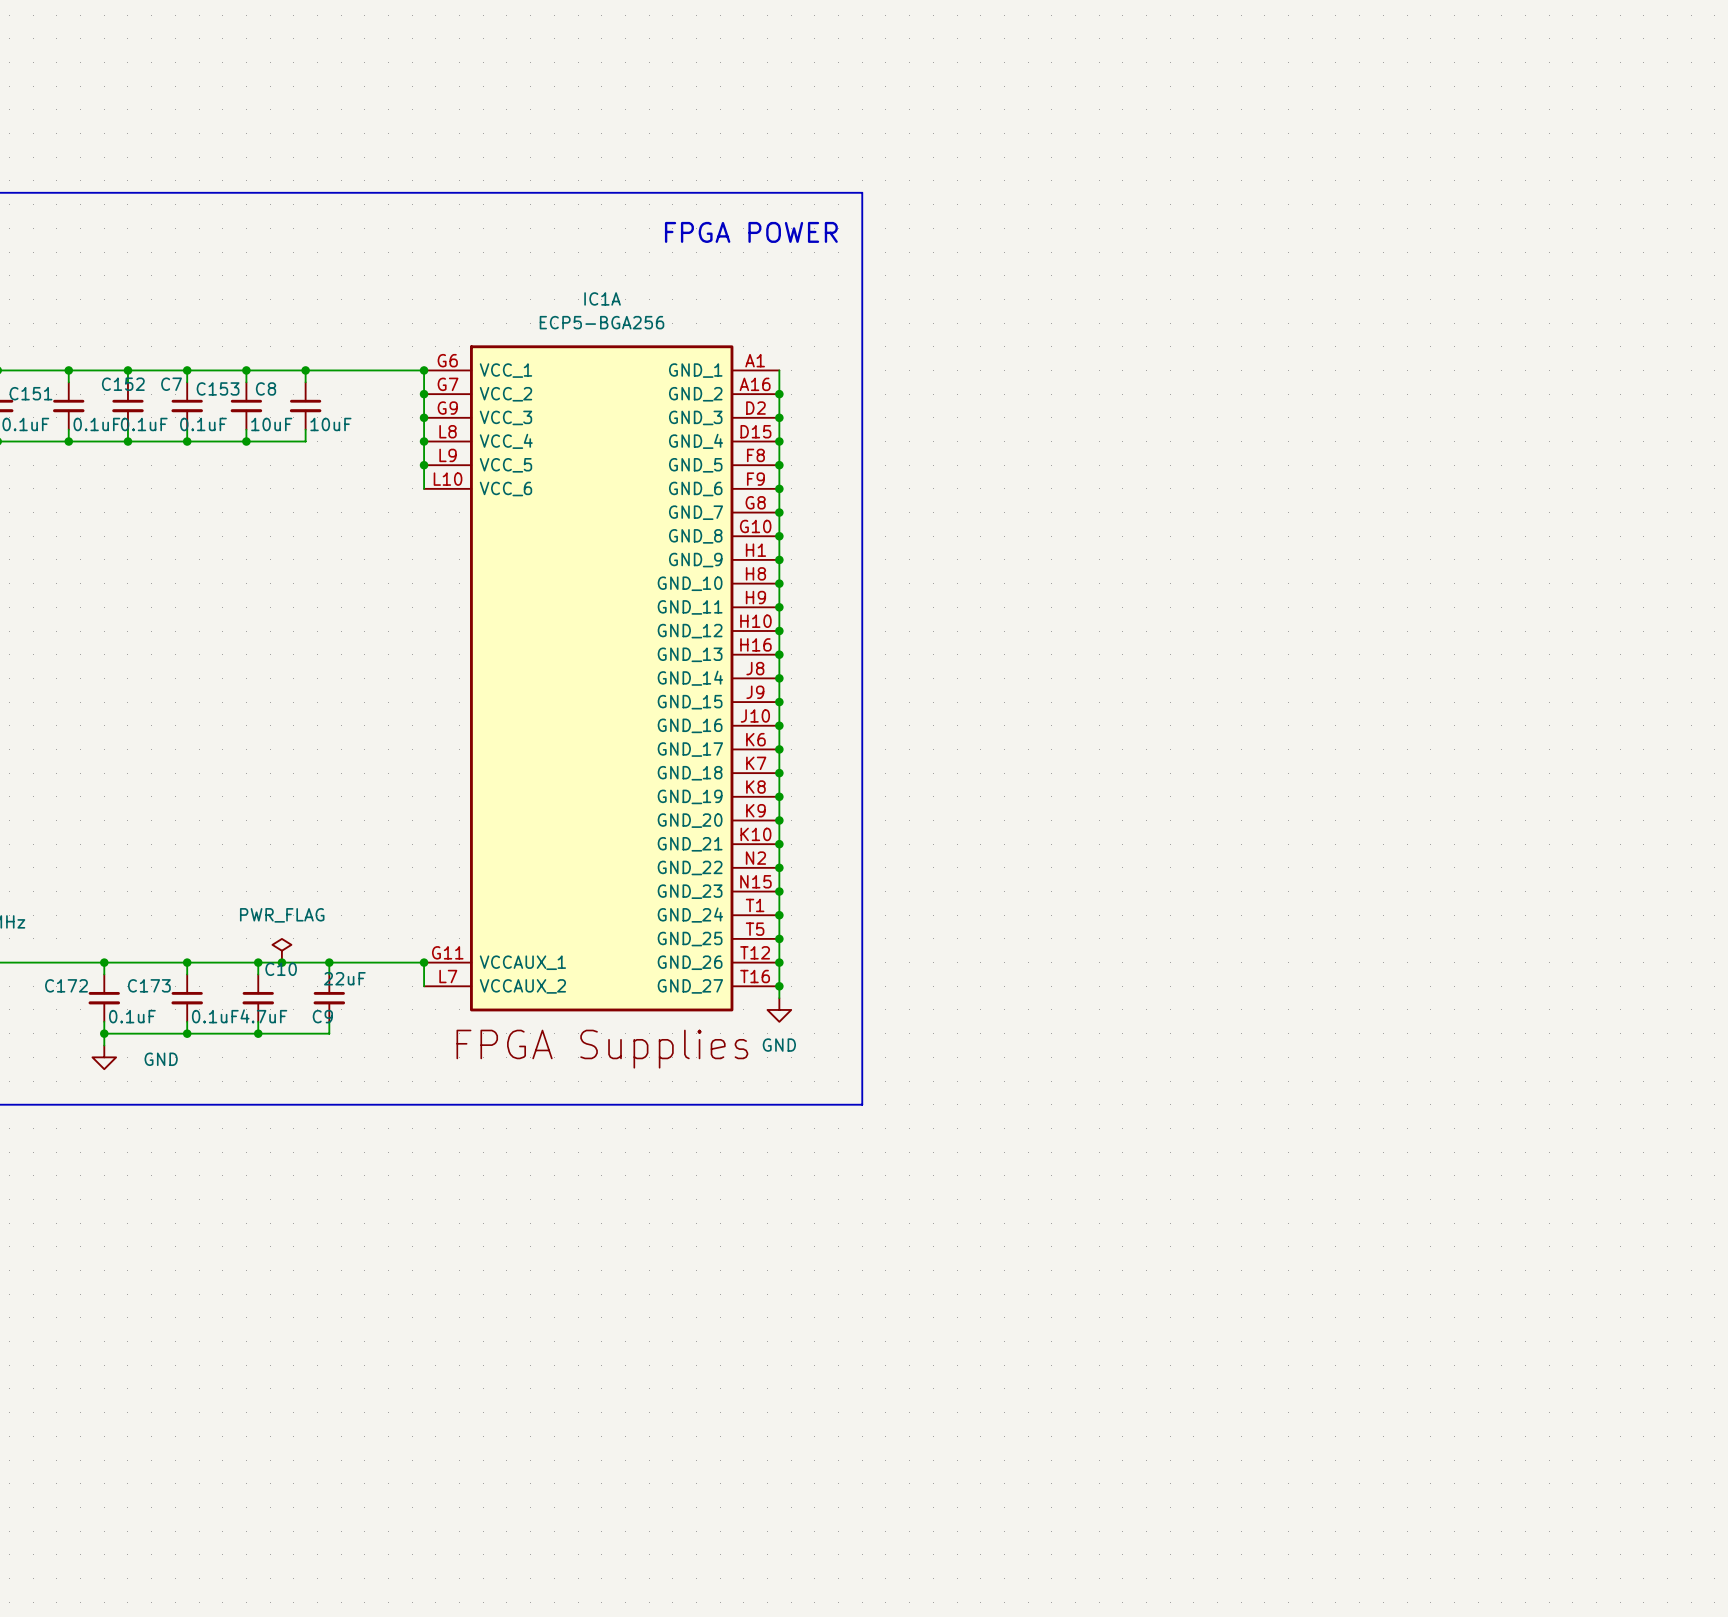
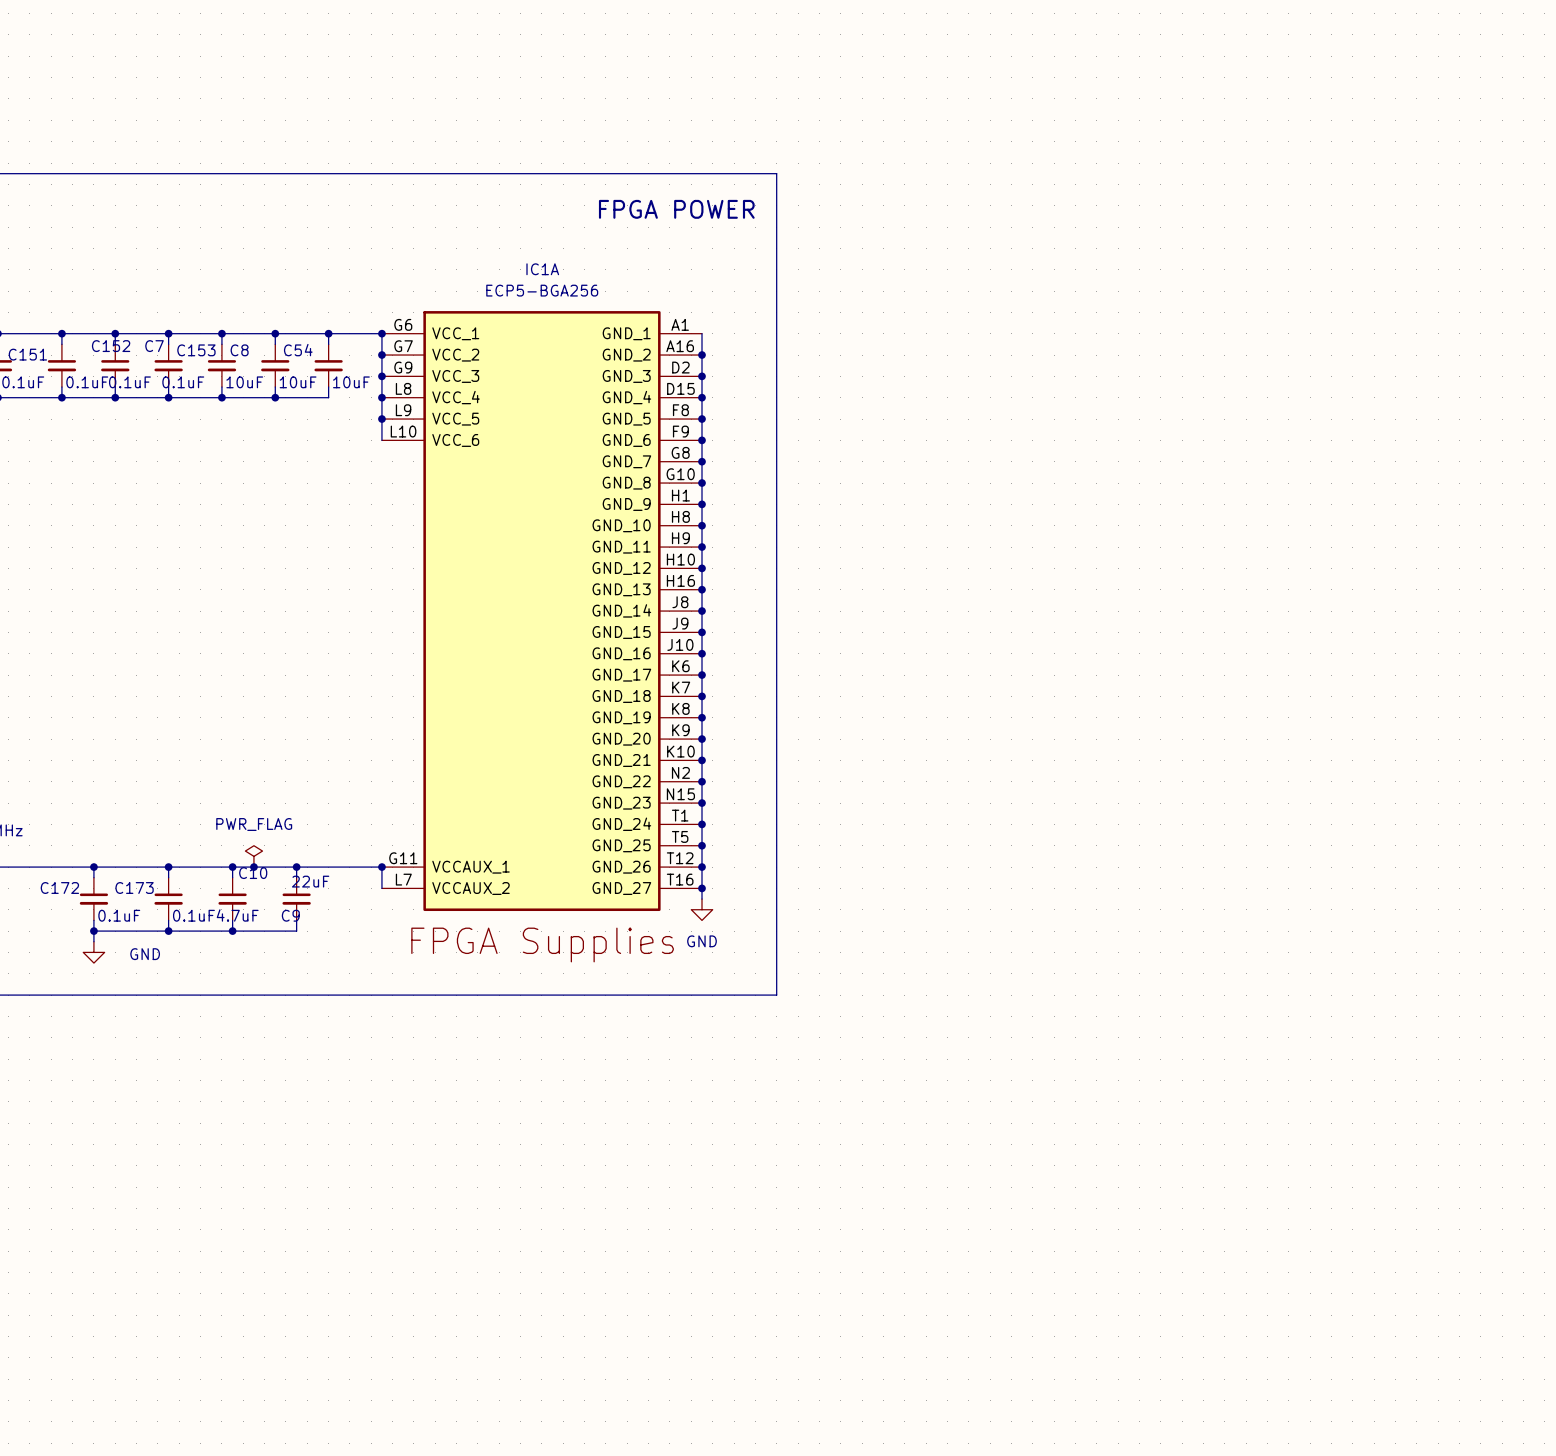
wire: none -> (328, 333) (328, 344)
junction: none -> (328, 333)
C54: none -> 10uF (328, 365)
wire: none -> (328, 387) (328, 397) (275, 397)
junction: none -> (275, 397)

